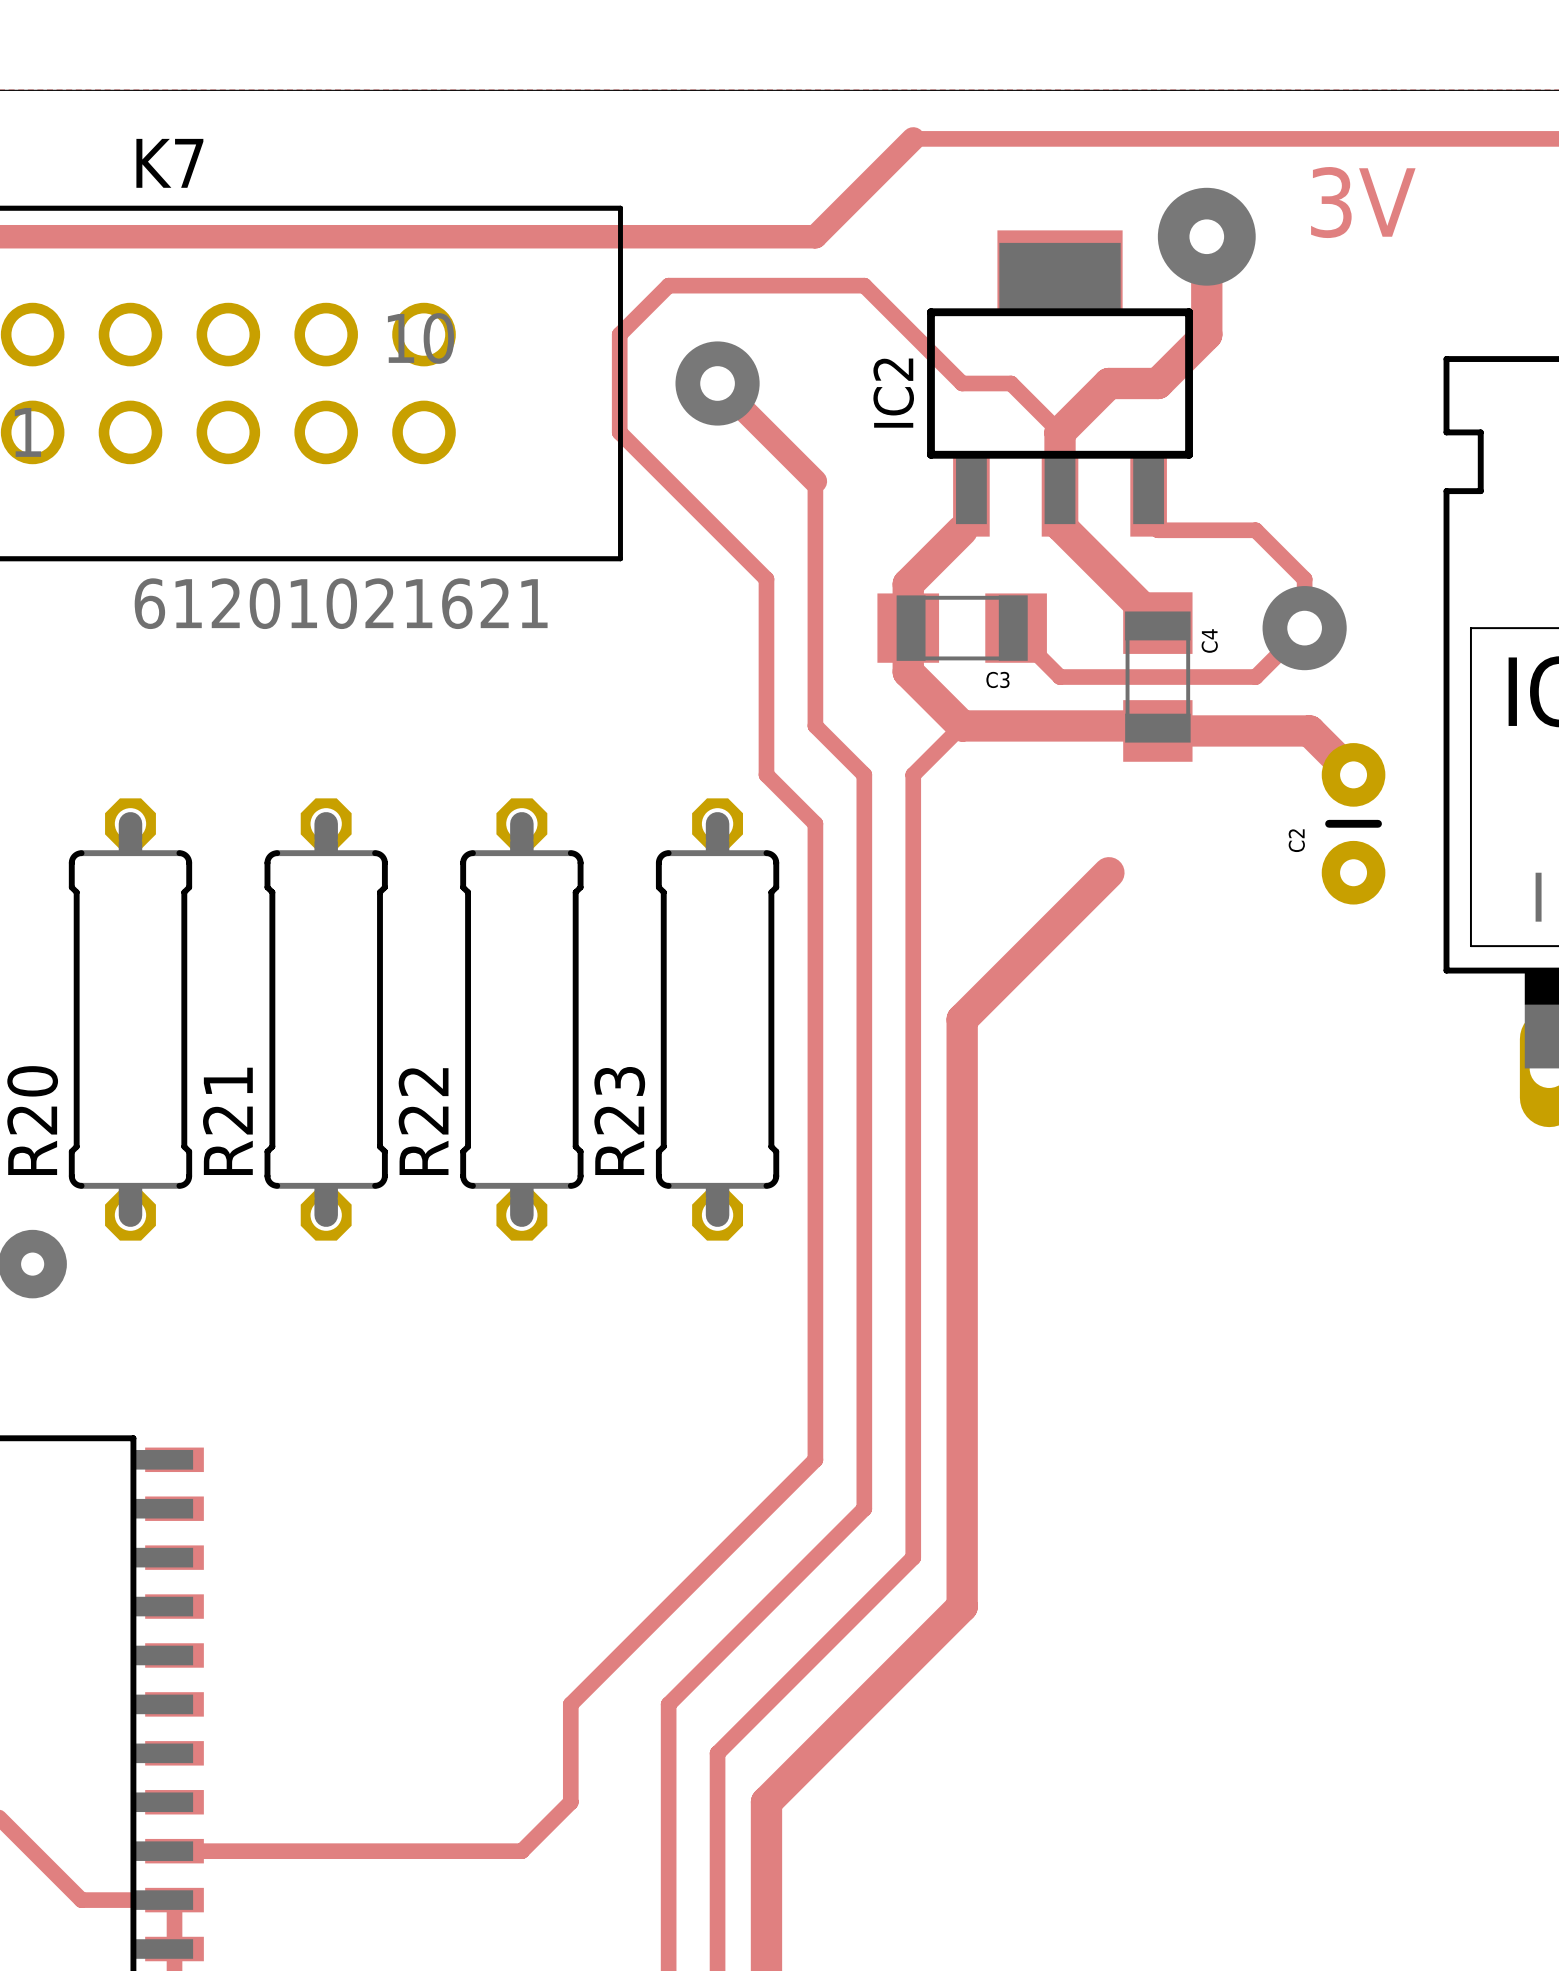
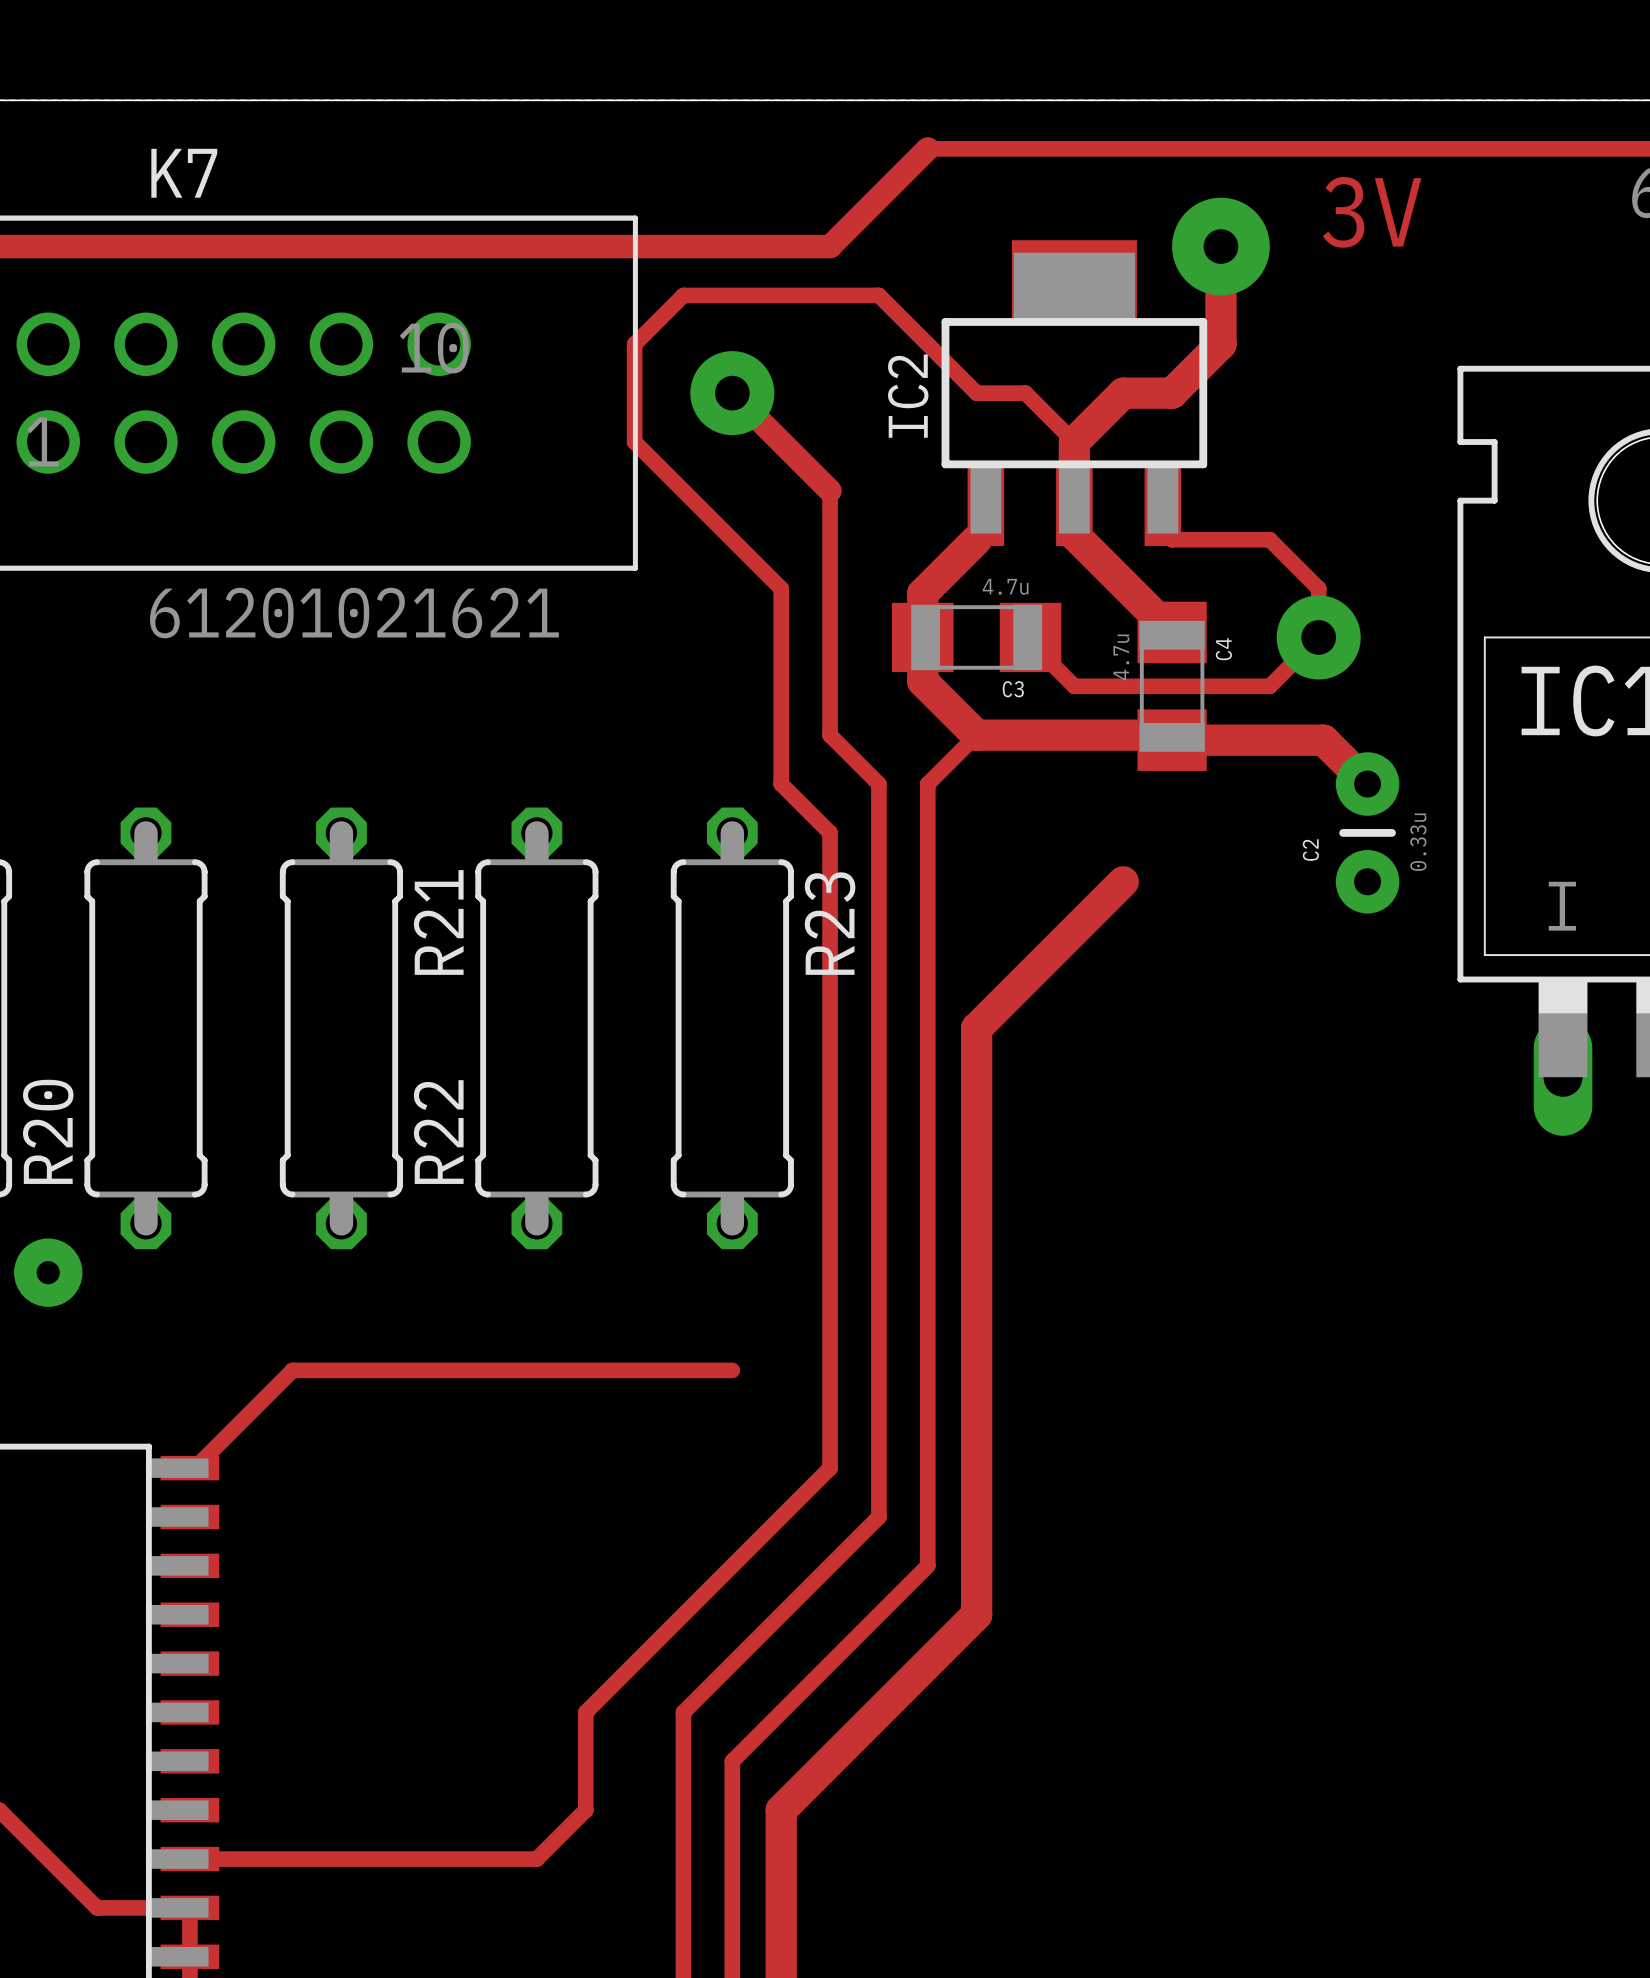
C3 value: none -> 4.7u (1005, 586)
C4 value: none -> 4.7u (1121, 657)
C2 value: none -> 0.33u (1418, 842)
R23 name position: R23 (619, 1120) -> R23 (830, 923)
R21 name position: R21 (227, 1121) -> R21 (438, 922)
track: none -> (732, 1370) (292, 1370) (194, 1468) (189, 1468)

